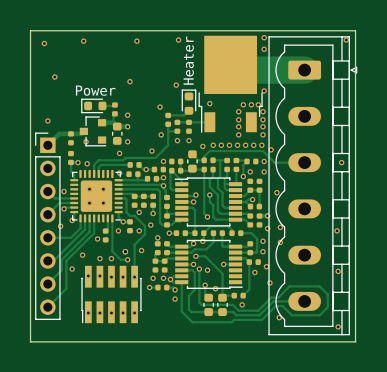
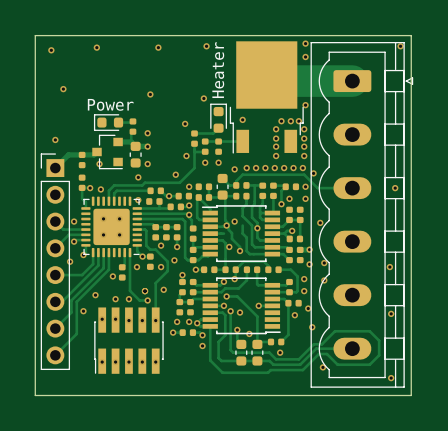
track: none -> (223, 196) (225, 220) (228, 223) (231, 238) (240, 246) (240, 249)
track: (204, 169) (204, 213) (207, 216) -> none
via: none -> (234, 221)
via: (209, 195) -> none
via: none -> (257, 228)
via: (193, 201) -> none
via: none -> (229, 246)

